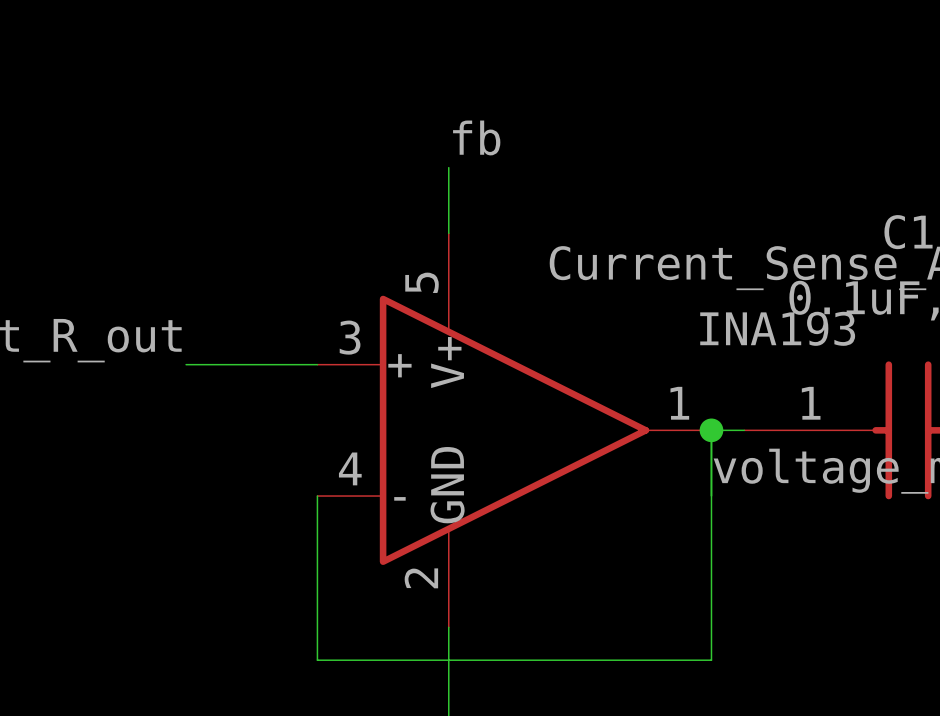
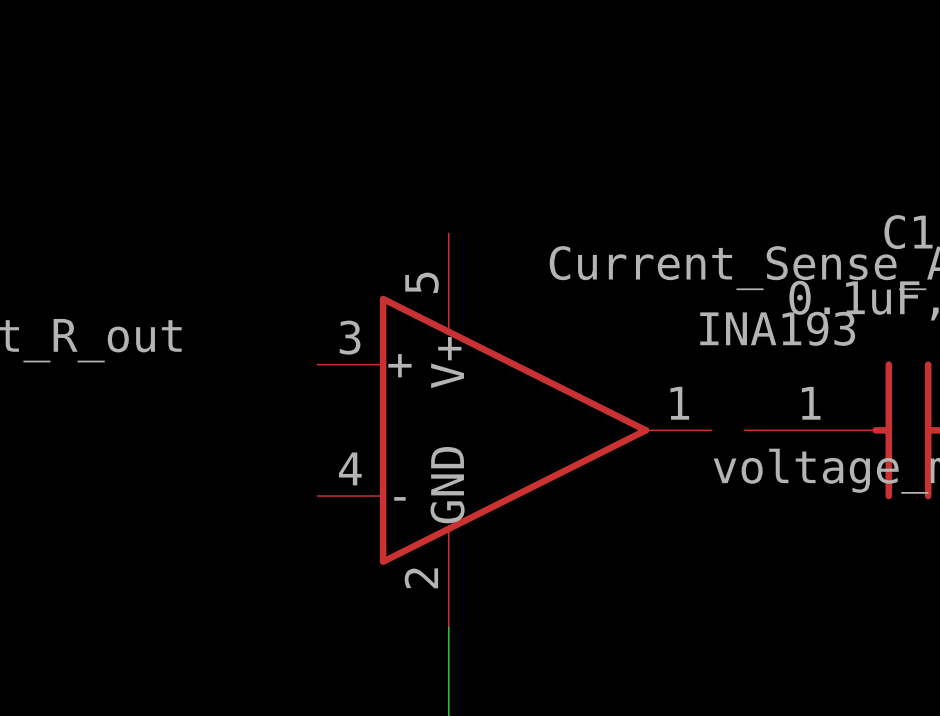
label: fb (476, 137) -> none
wire: (448, 167) (448, 233) -> none
wire: (186, 364) (317, 364) -> none
junction: (711, 430) -> none
wire: (744, 430) (711, 430) (711, 660) (317, 660) (317, 496) -> none

